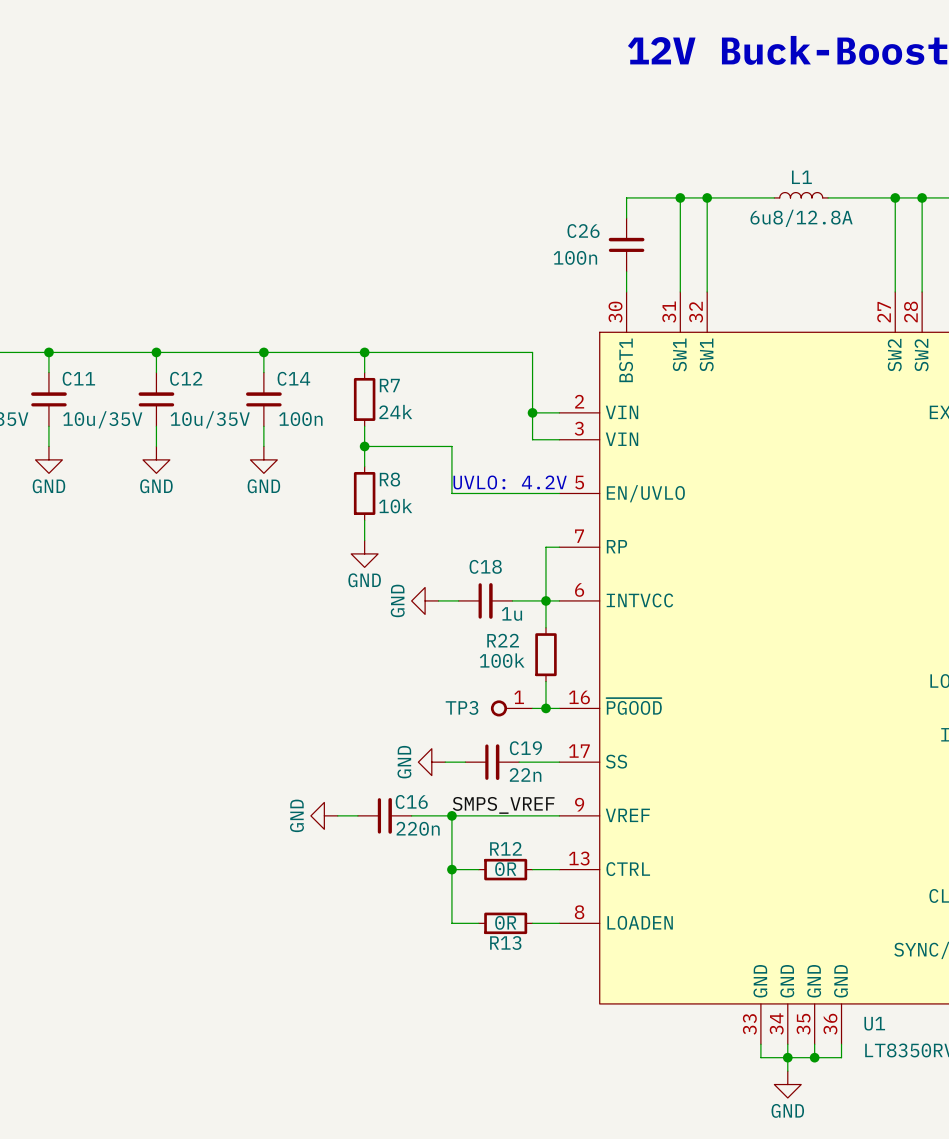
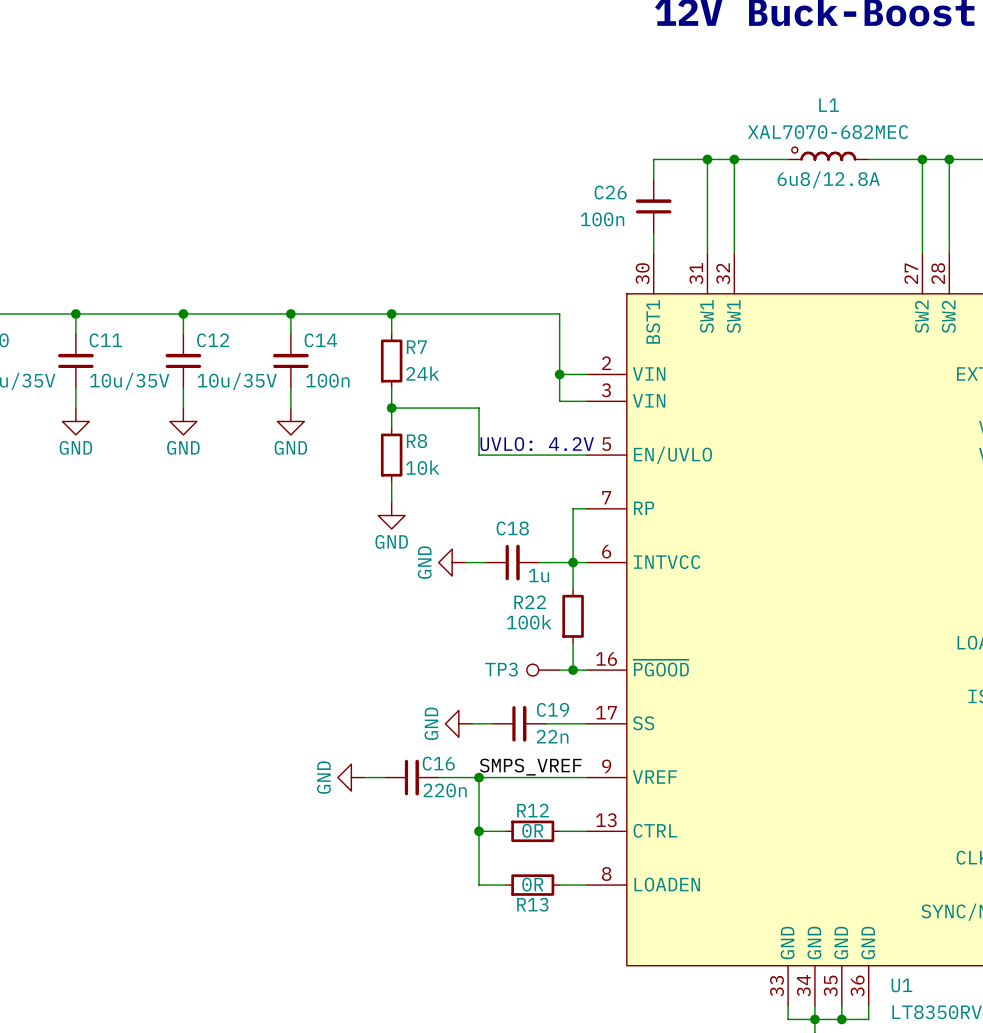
L1 value: none -> XAL7070-682MEC (828, 132)
L1 name position: L1 (801, 177) -> L1 (829, 105)
L1 symbol: [774, 192, 829, 198] -> [788, 147, 869, 162]
TP3 symbol: [490, 700, 533, 717] -> [526, 664, 560, 676]

